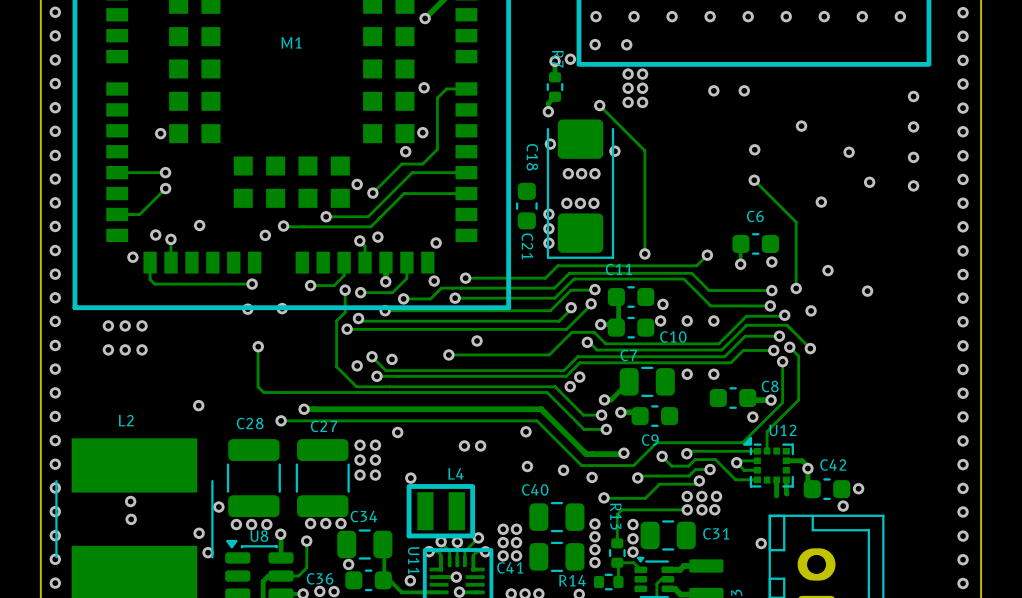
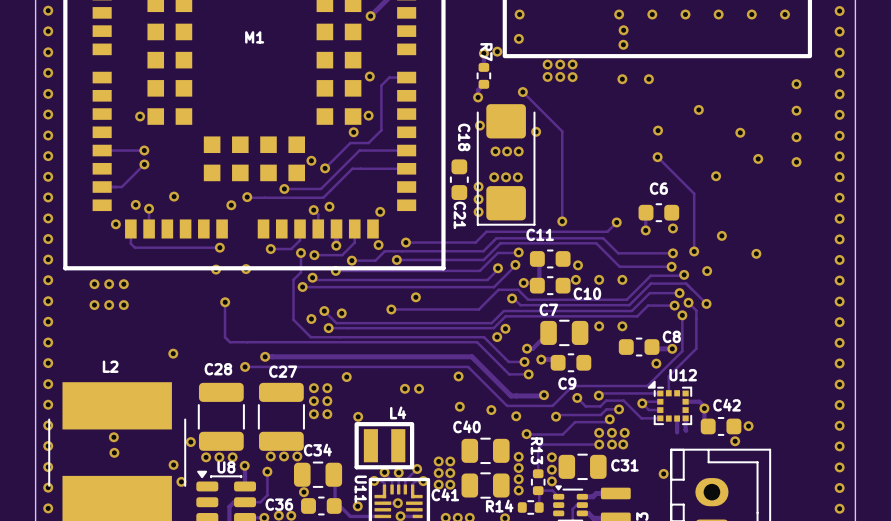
via: (634, 16) -> none
via: (672, 16) -> none
via: none -> (623, 30)
via: (626, 44) -> none
via: none -> (623, 44)
via: none -> (572, 64)
via: none -> (572, 77)
via: (628, 102) -> none
via: (642, 102) -> none

